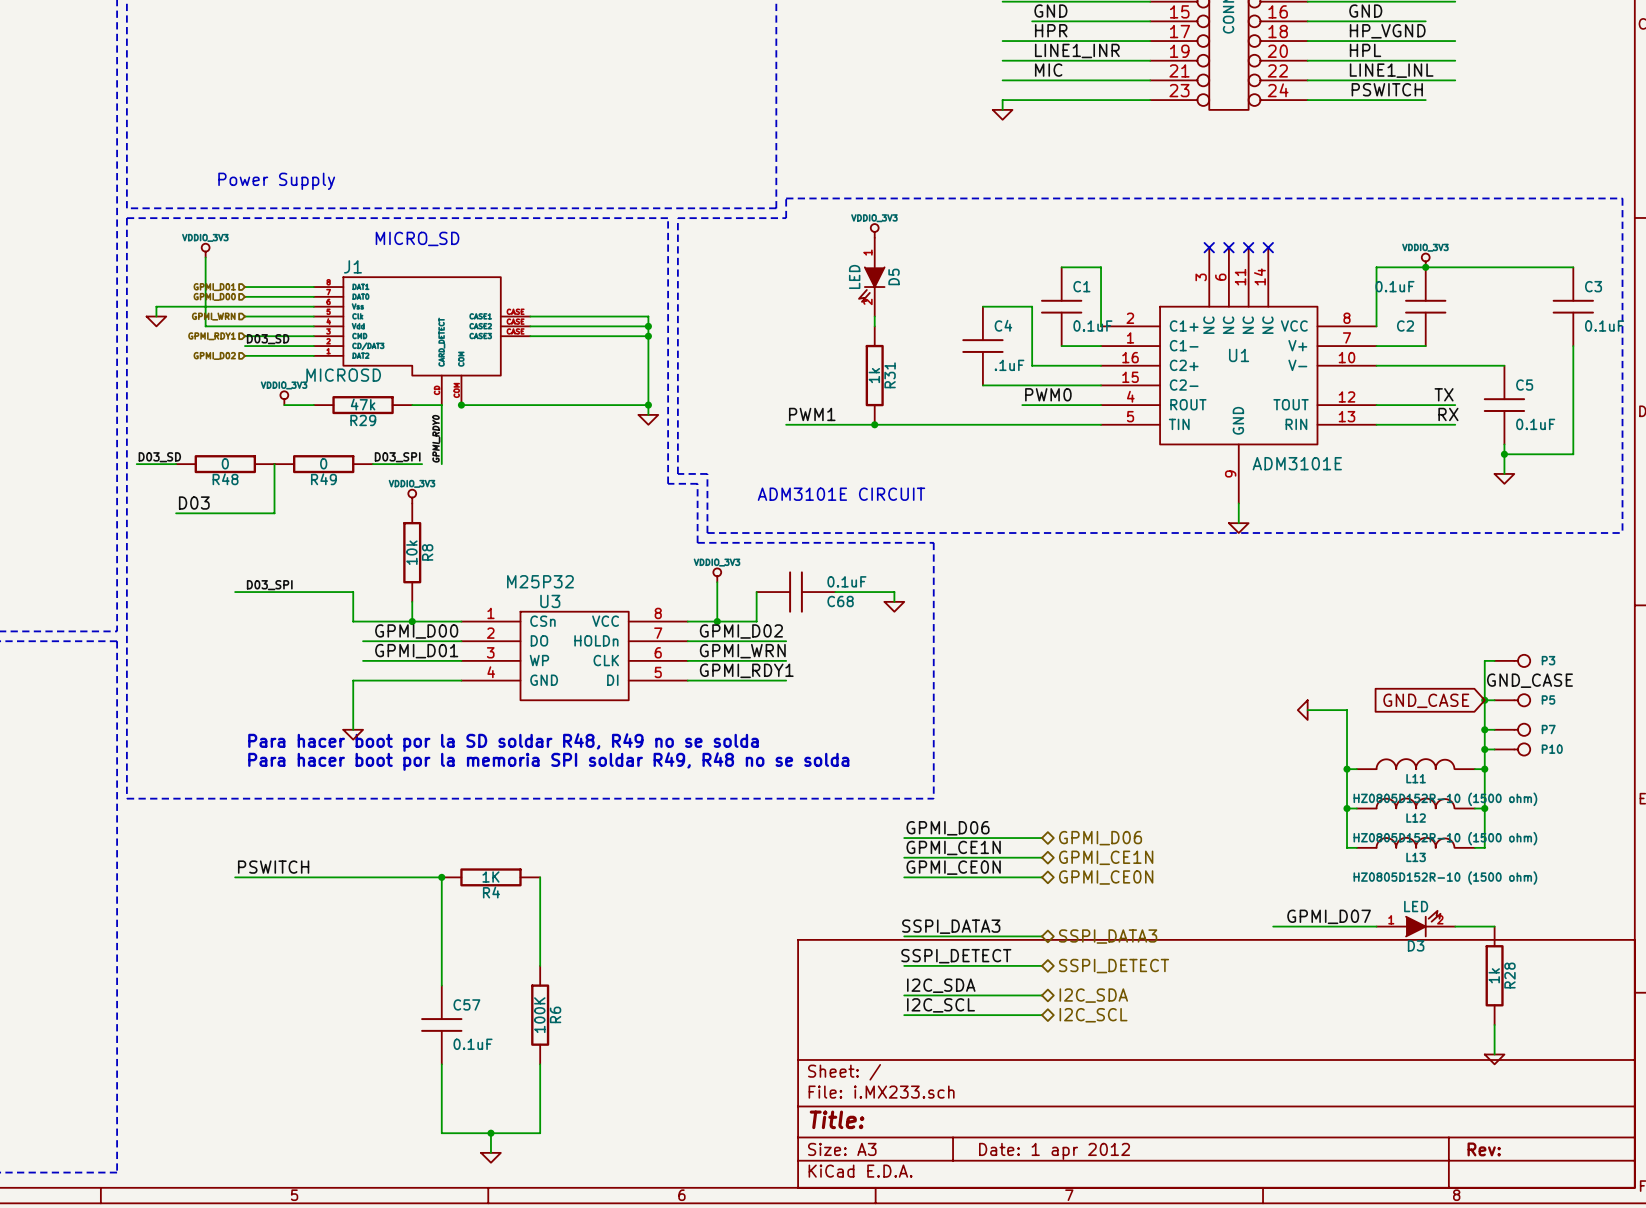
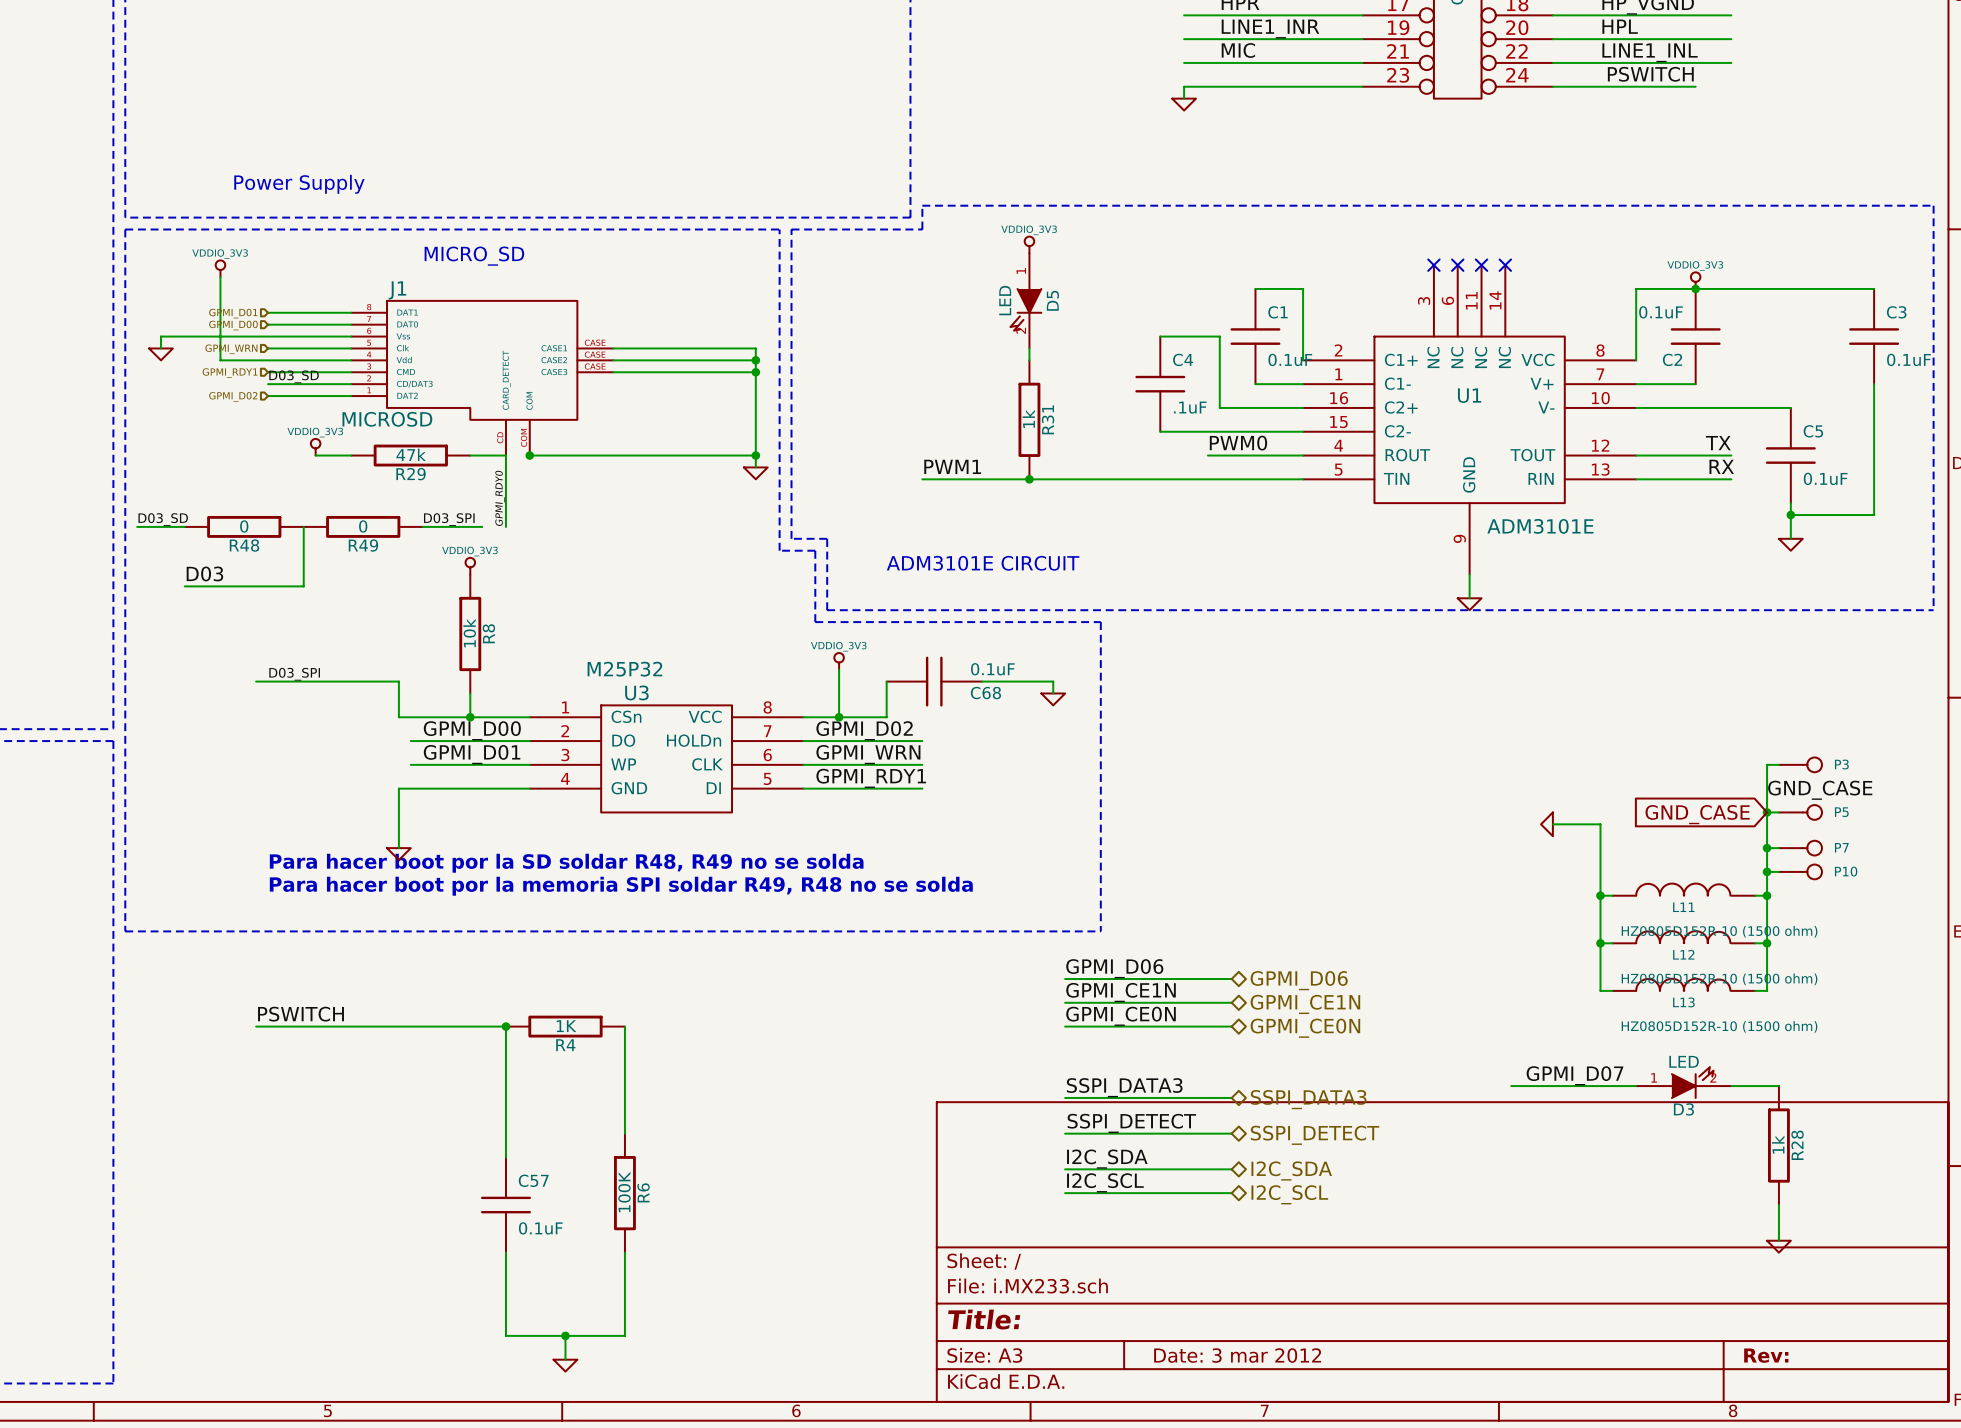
title block: Date: 1 apr 2012 (1054, 1151) -> Date: 3 mar 2012 (1237, 1355)

